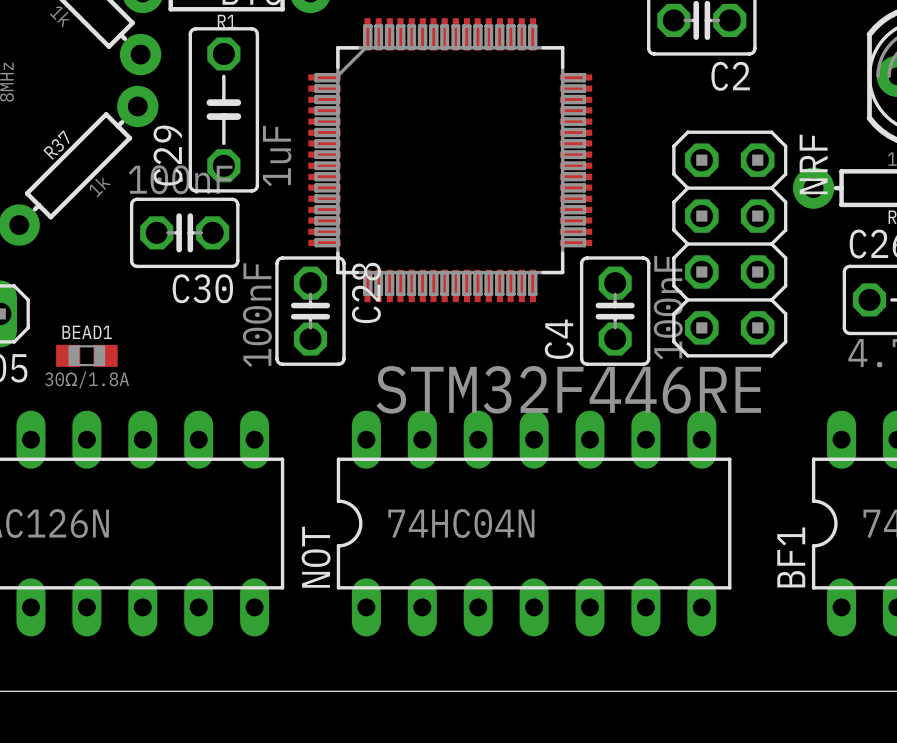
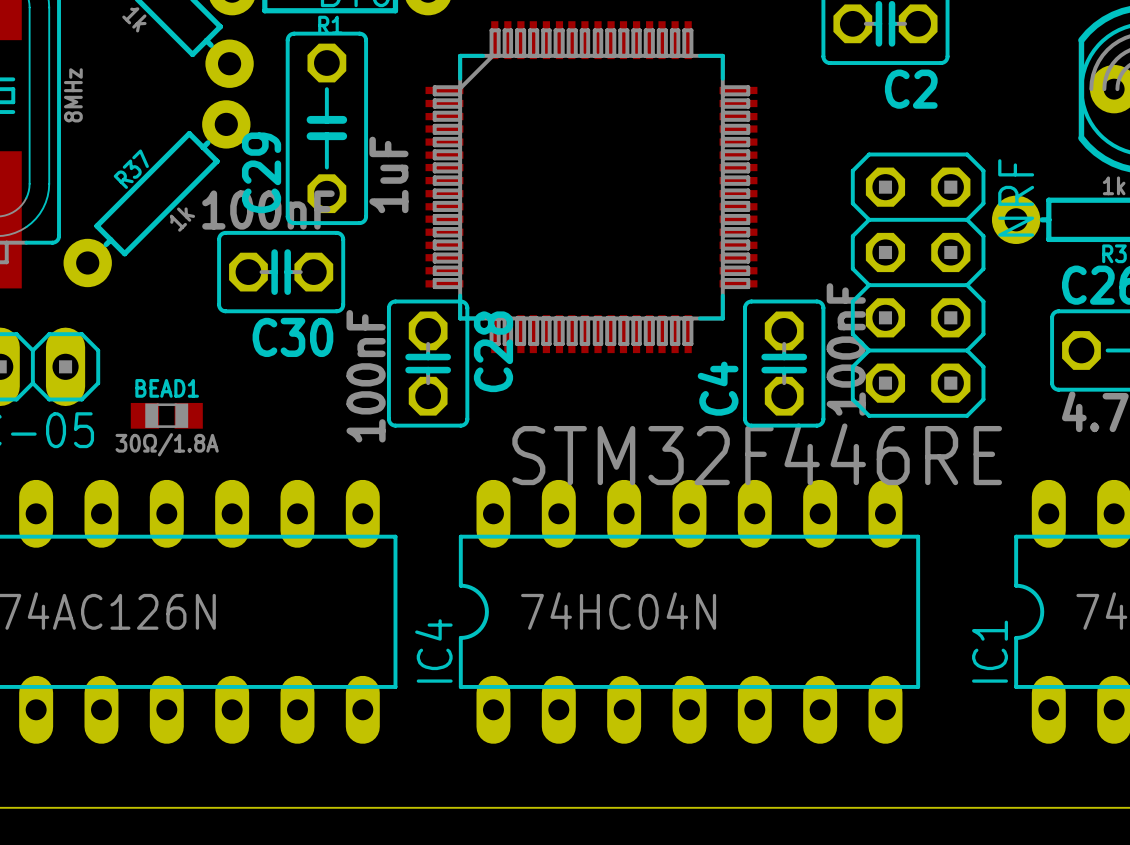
NOT name: NOT (316, 557) -> IC4 (433, 650)
BF1 name: BF1 (791, 557) -> IC1 (990, 651)

